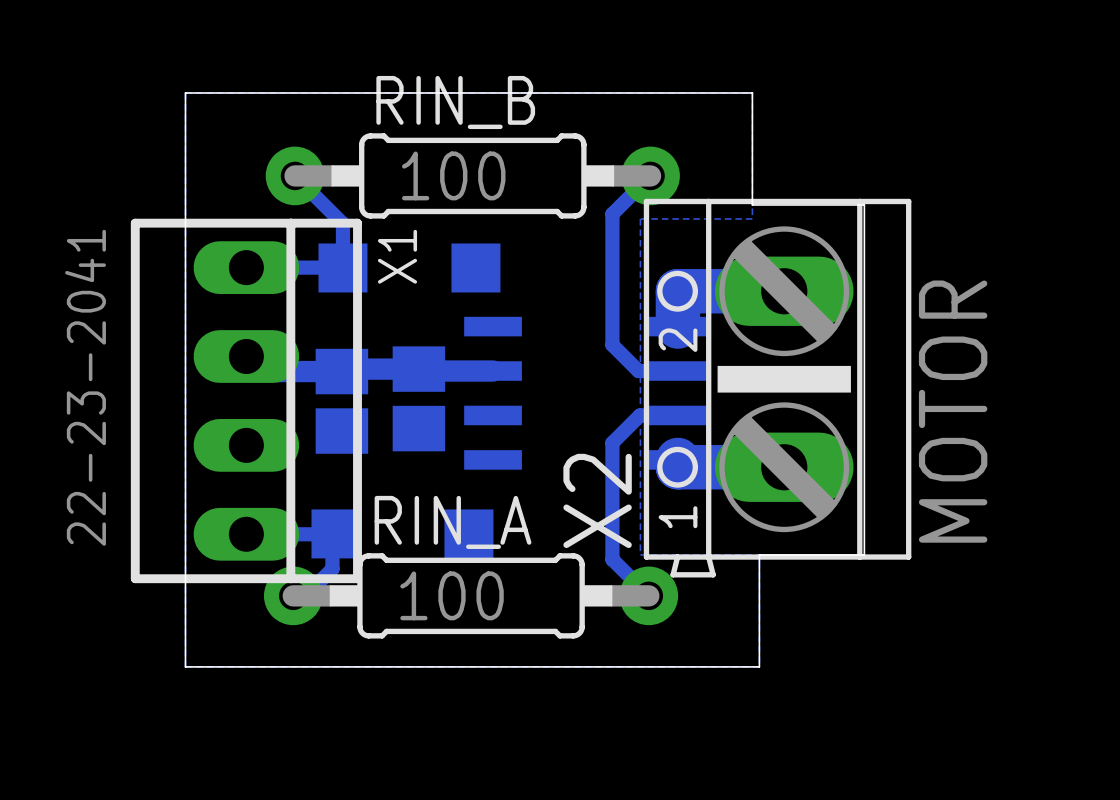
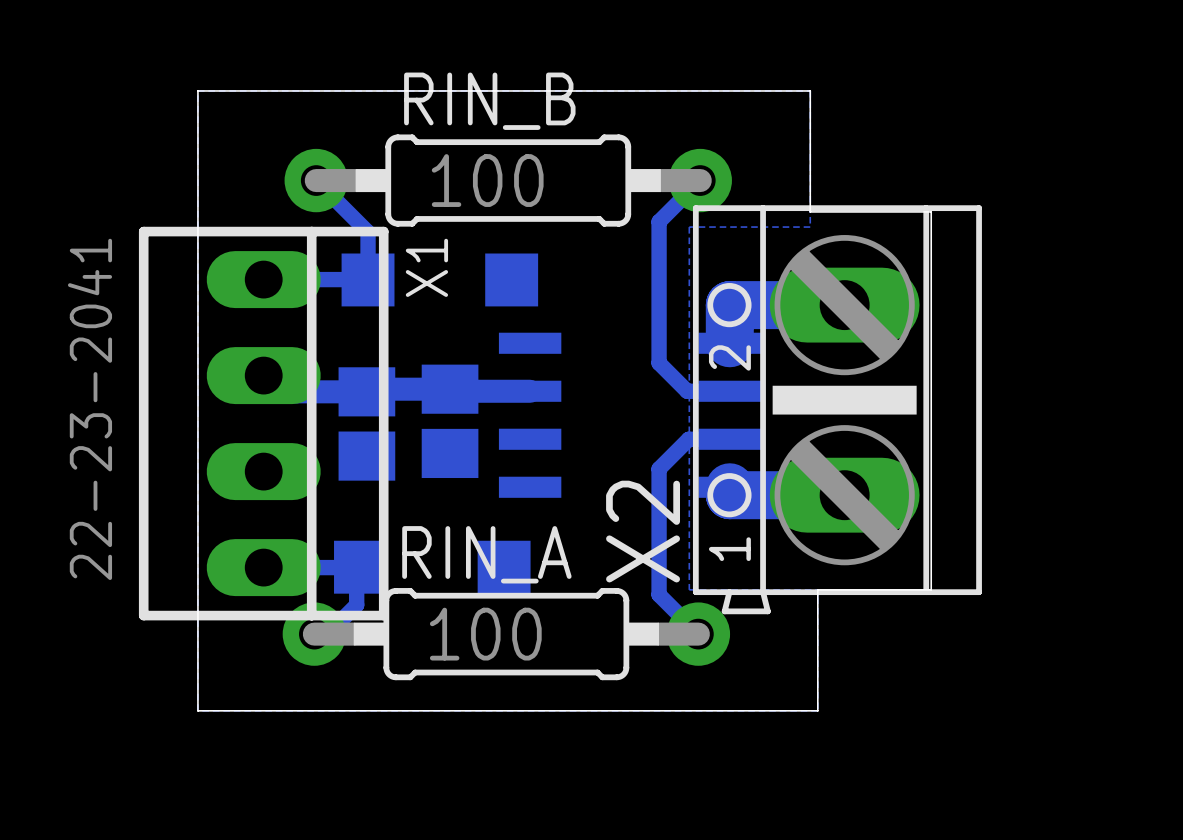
X2 value: MOTOR (953, 411) -> none

